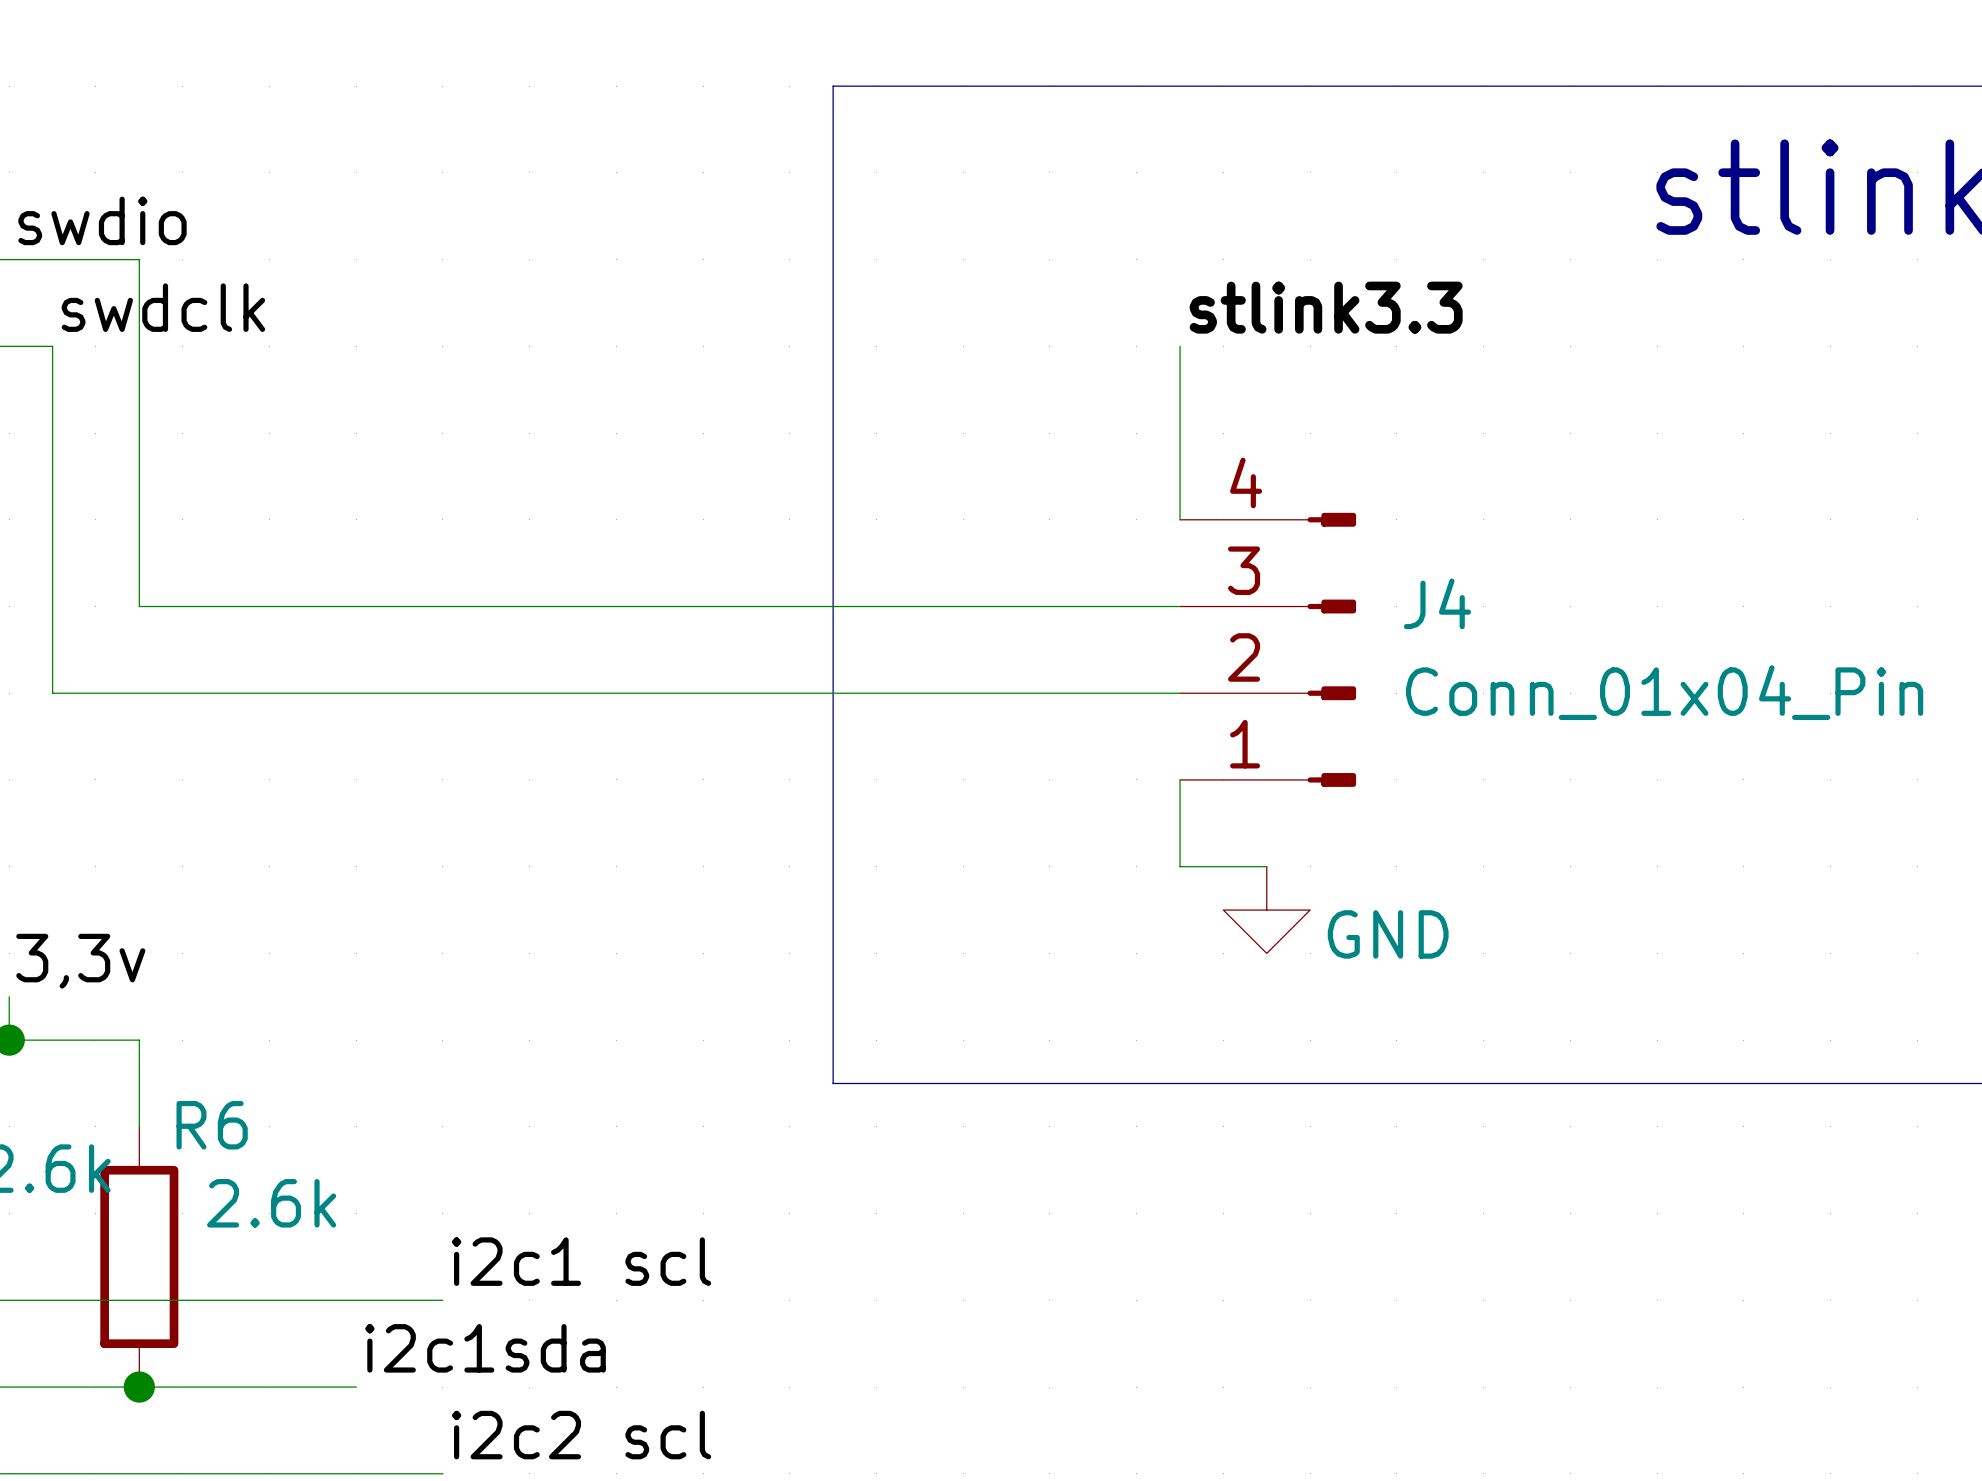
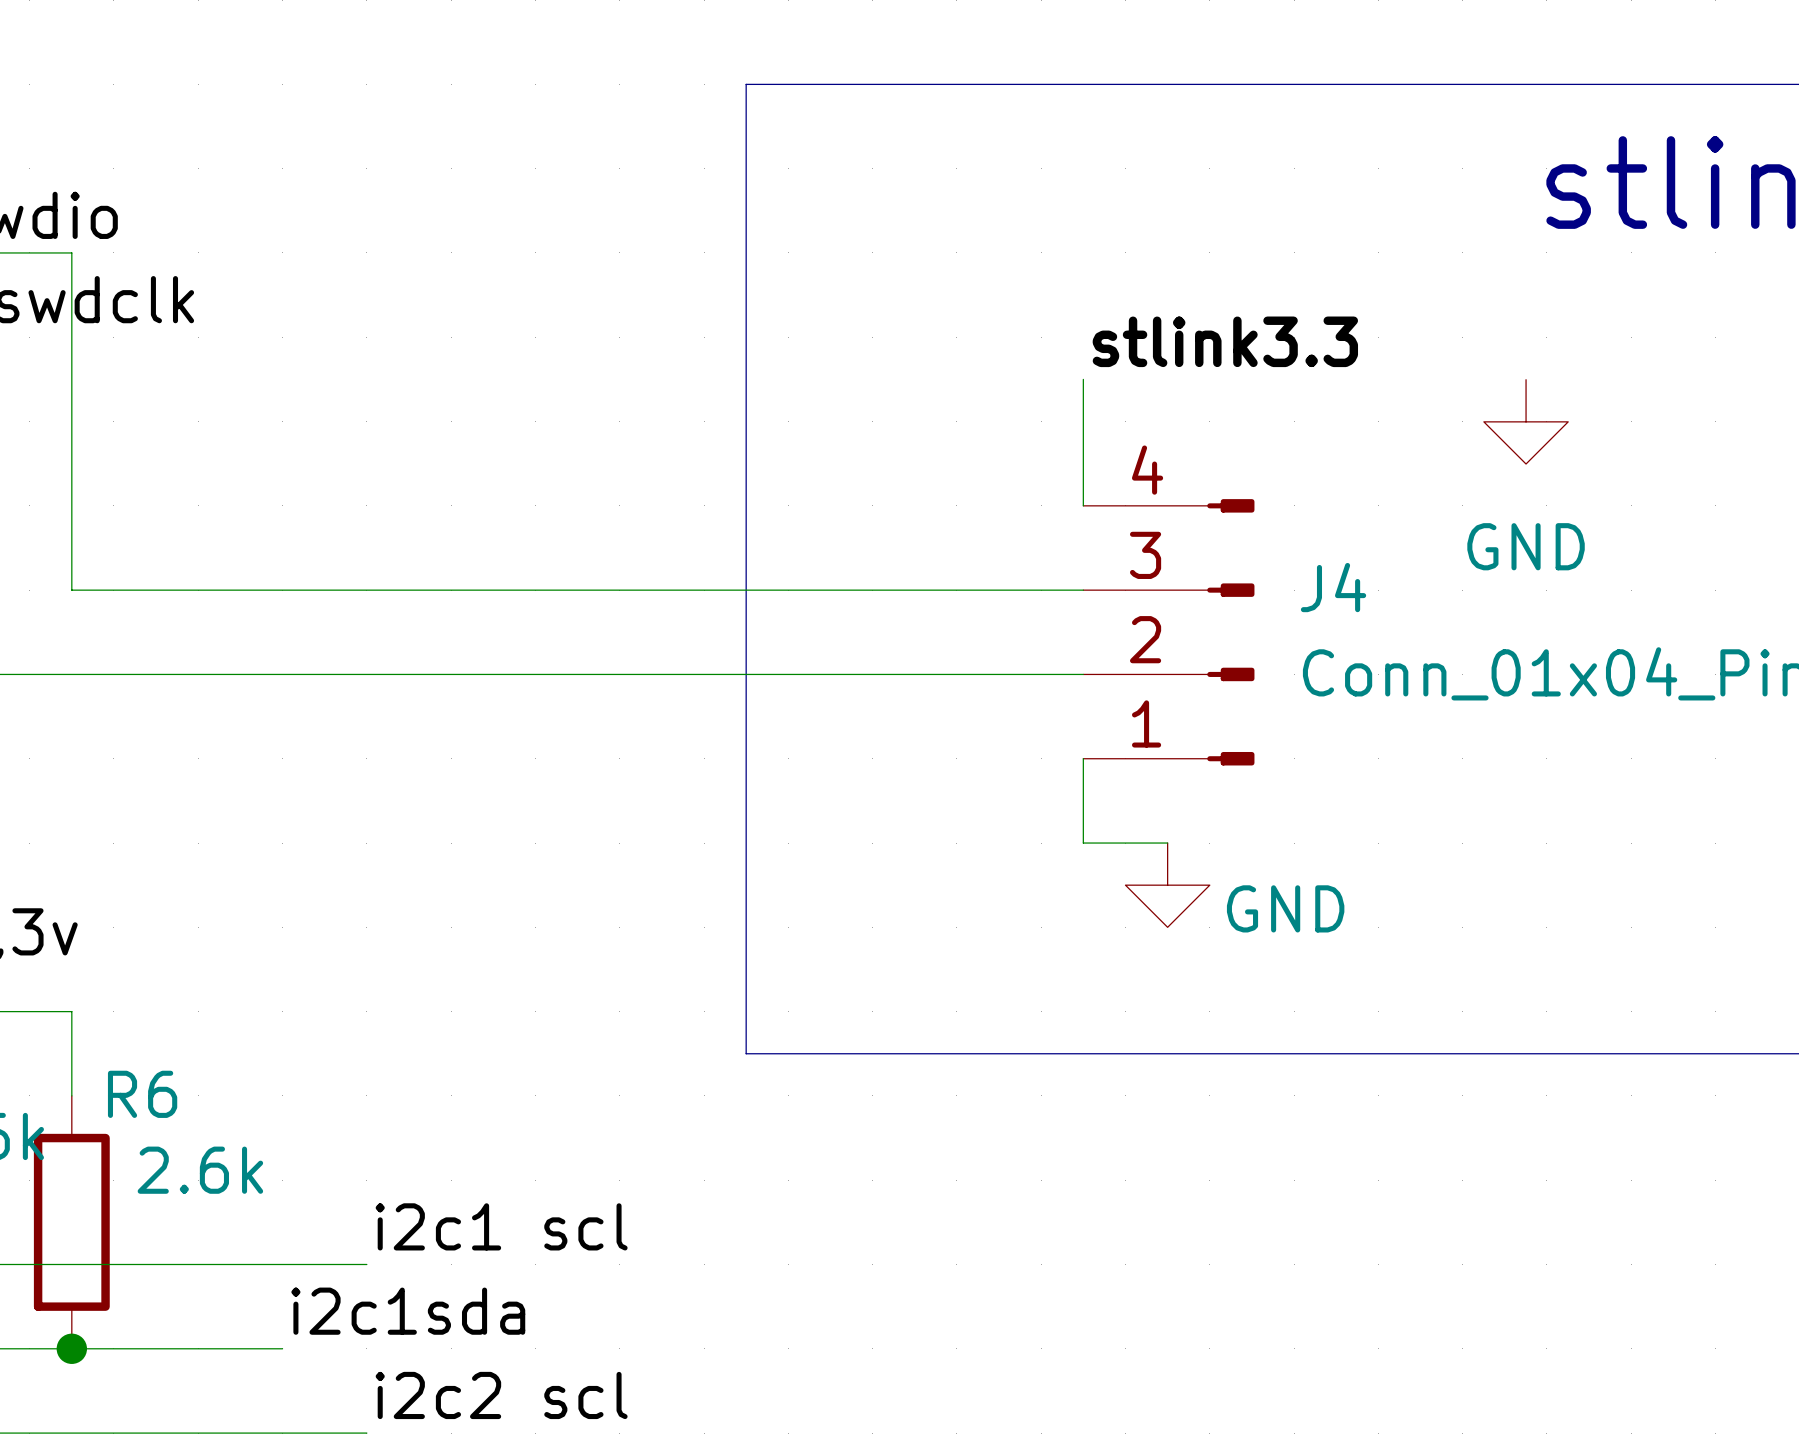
label position: stlink3.3 (1326, 307) -> stlink3.3 (1225, 341)
wire: (1180, 346) (1180, 389) -> none
power symbol: none -> GND (1526, 421)

